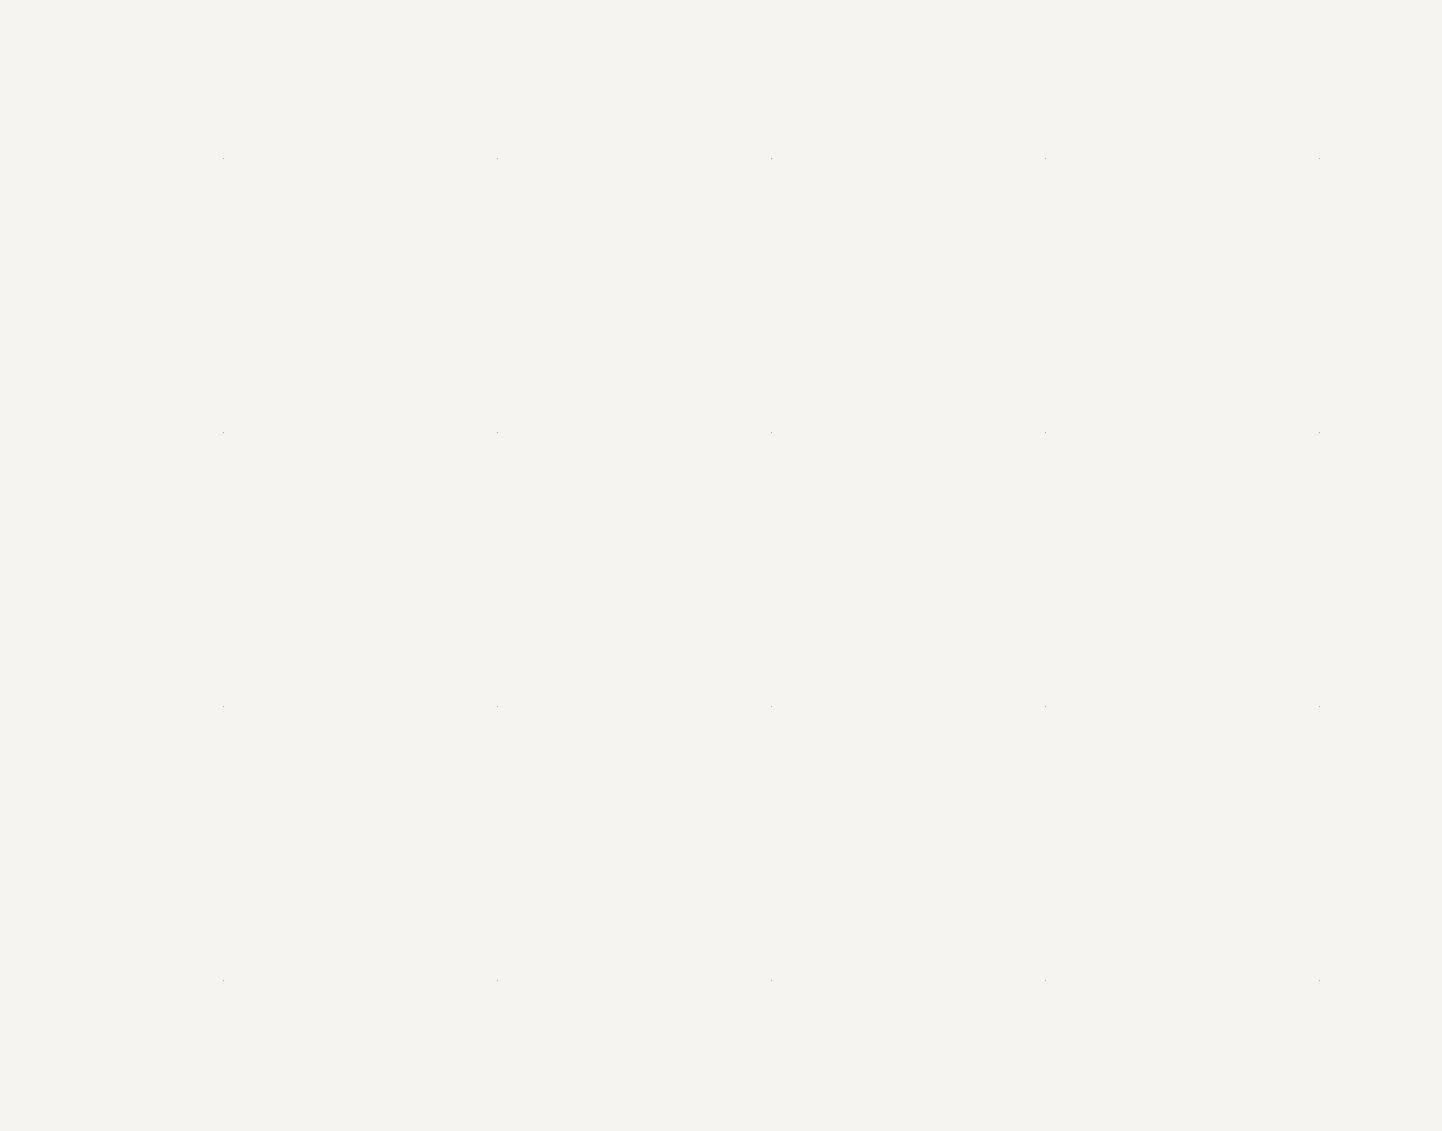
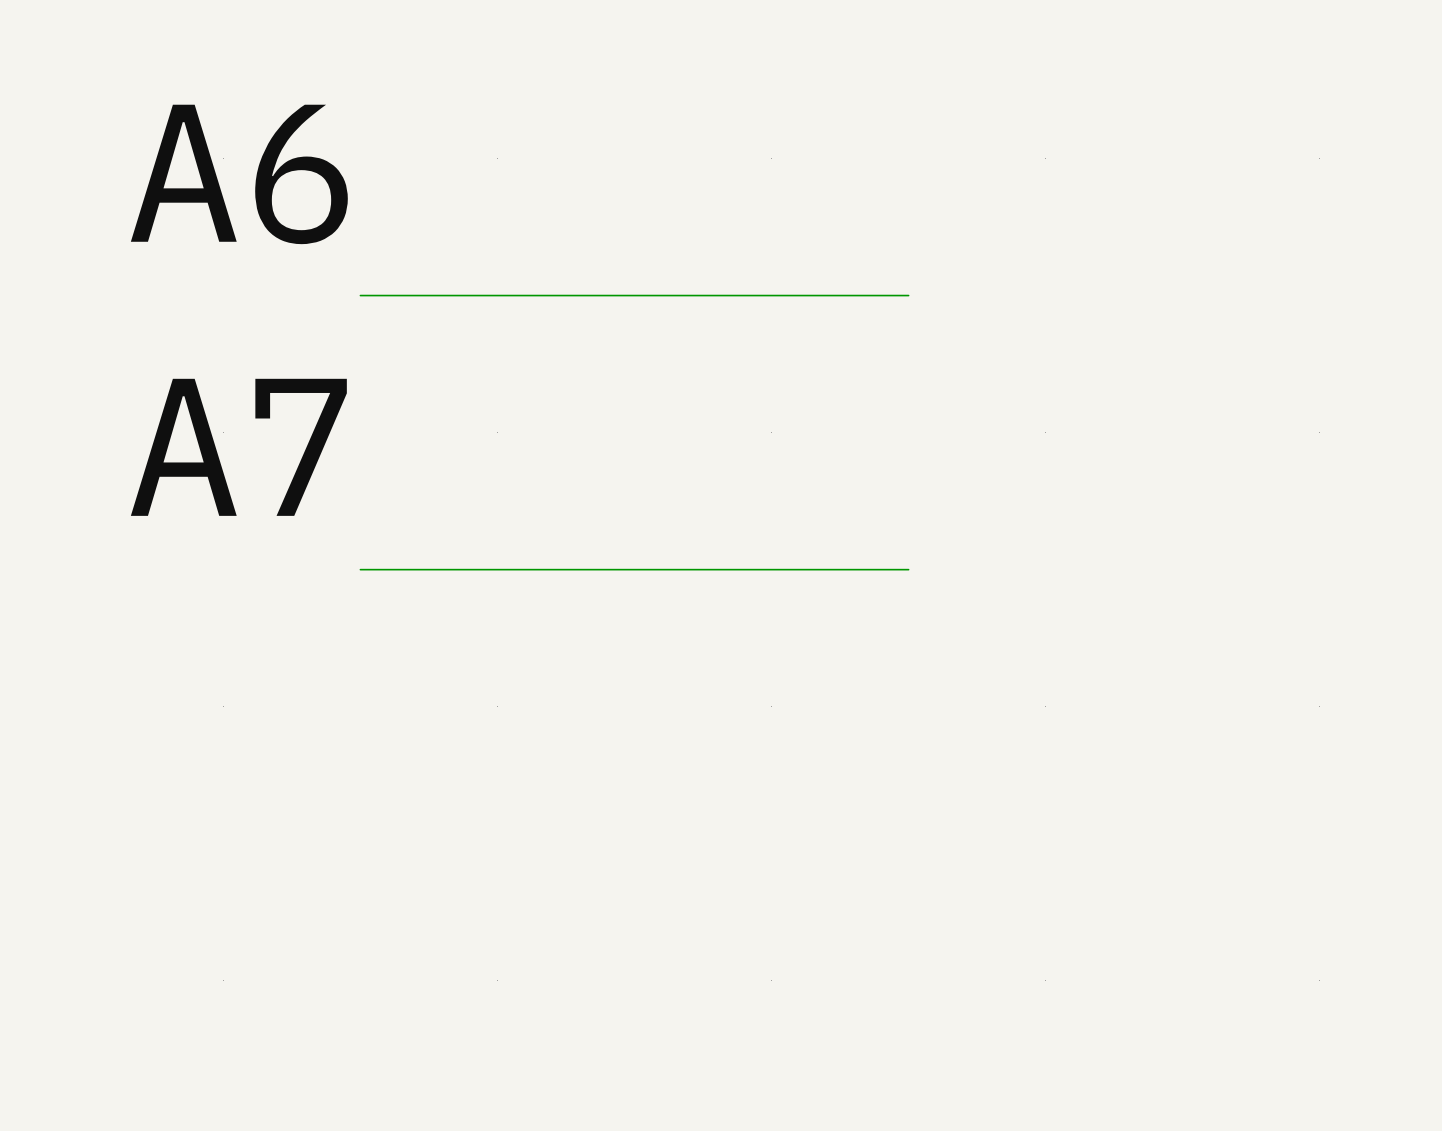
label: none -> A6 (239, 174)
wire: none -> (360, 295) (908, 295)
label: none -> A7 (238, 447)
wire: none -> (360, 569) (908, 569)

